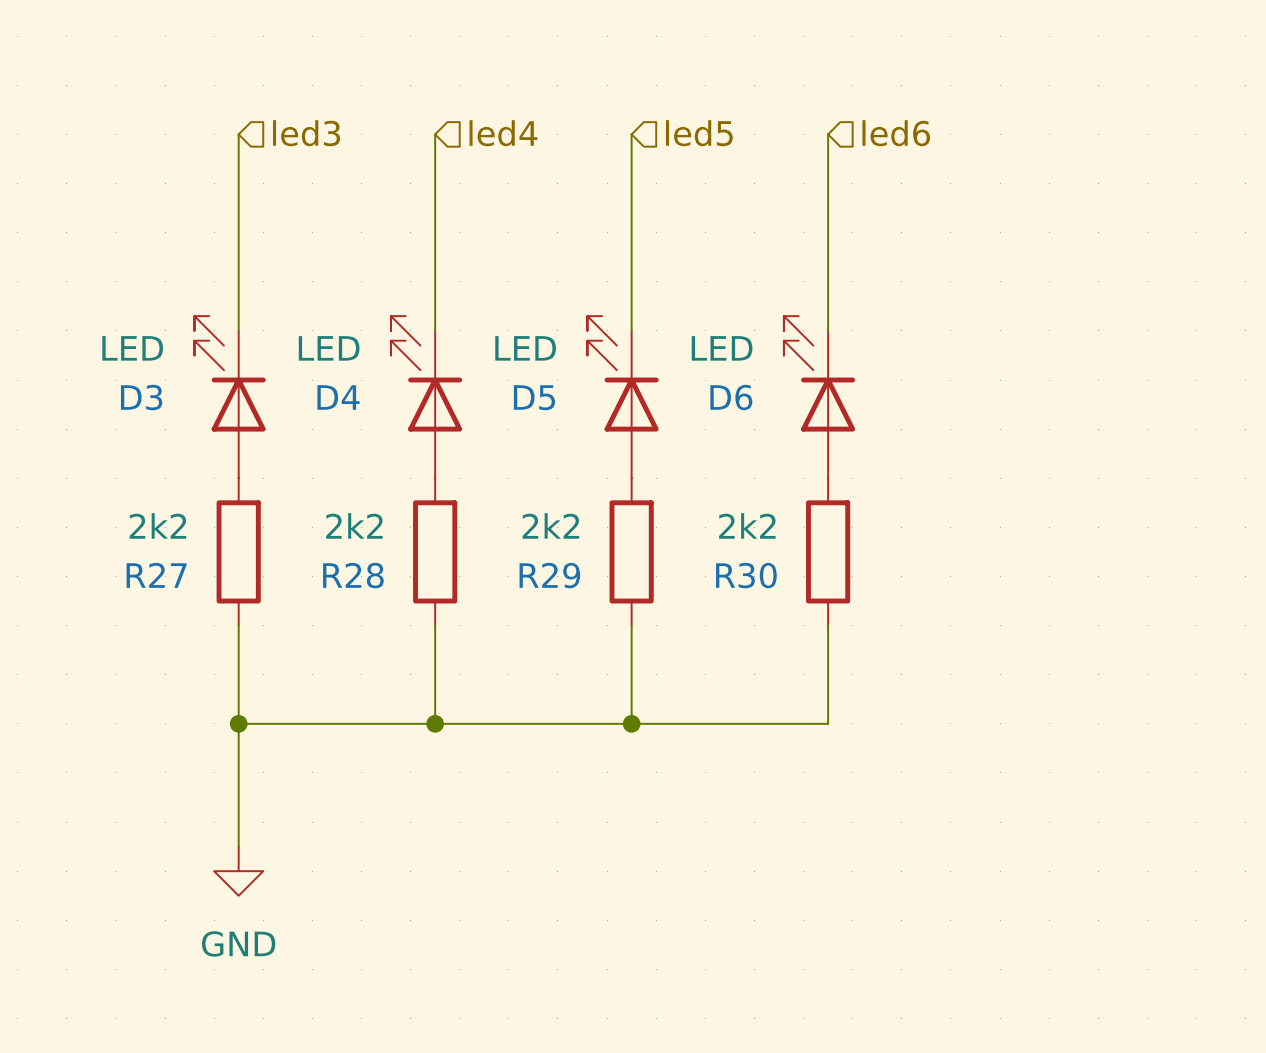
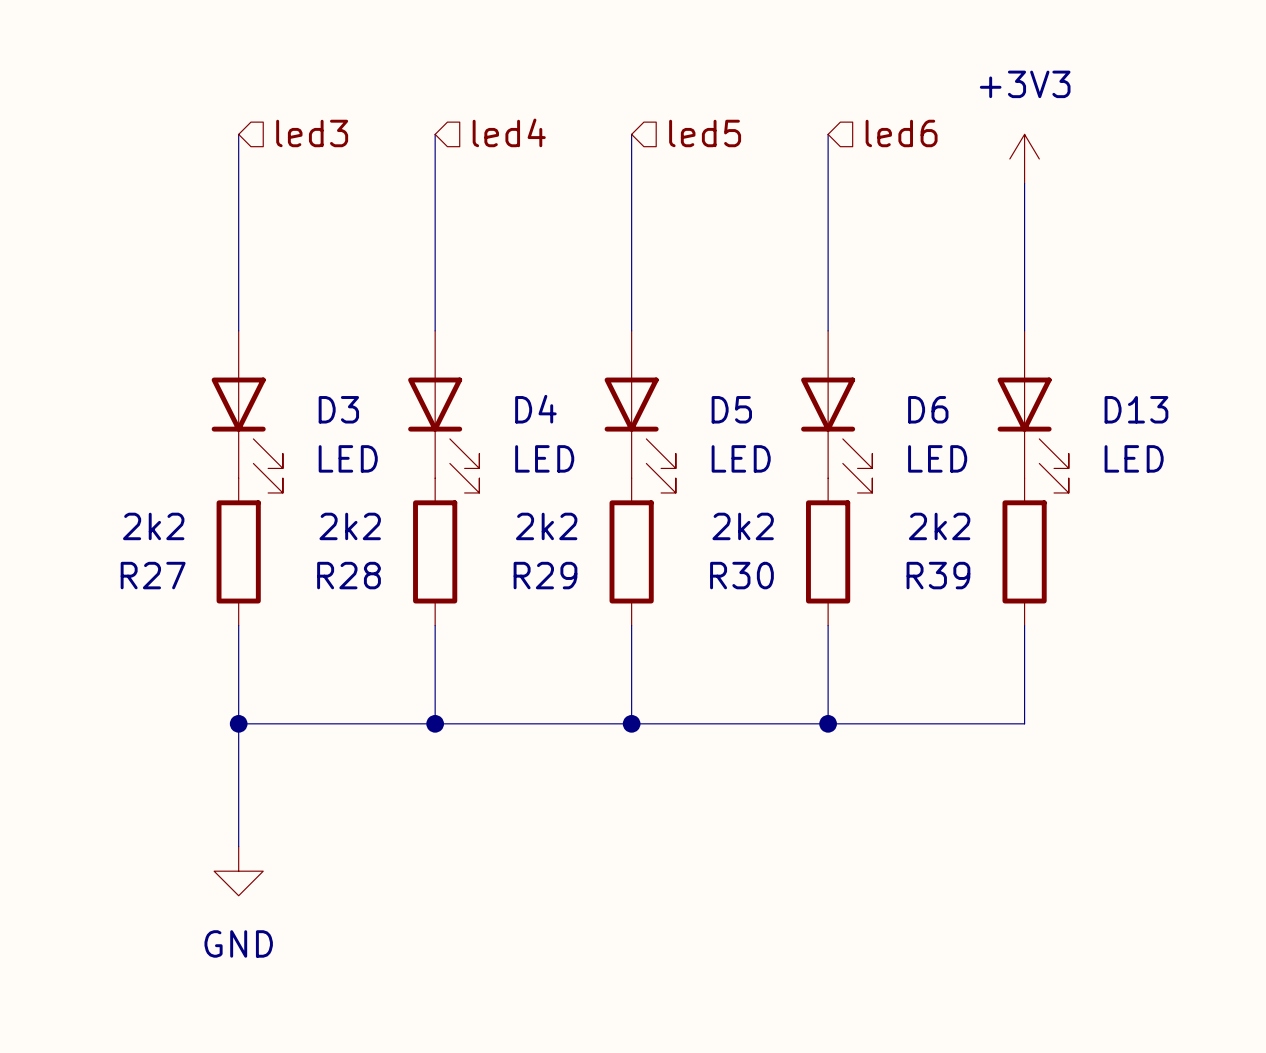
power symbol: none -> +3V3 (1024, 158)
wire: none -> (1024, 183) (1024, 330)
D3 rotation: 0° (230, 373) -> 180° (247, 435)
D4 rotation: 0° (426, 373) -> 180° (443, 435)
D5 rotation: 0° (623, 373) -> 180° (640, 435)
D6 rotation: 0° (819, 373) -> 180° (836, 435)
D13: none -> LED (1033, 411)
R39: none -> 2k2 (1024, 551)
wire: none -> (1024, 625) (1024, 723) (828, 723)
junction: none -> (828, 723)

